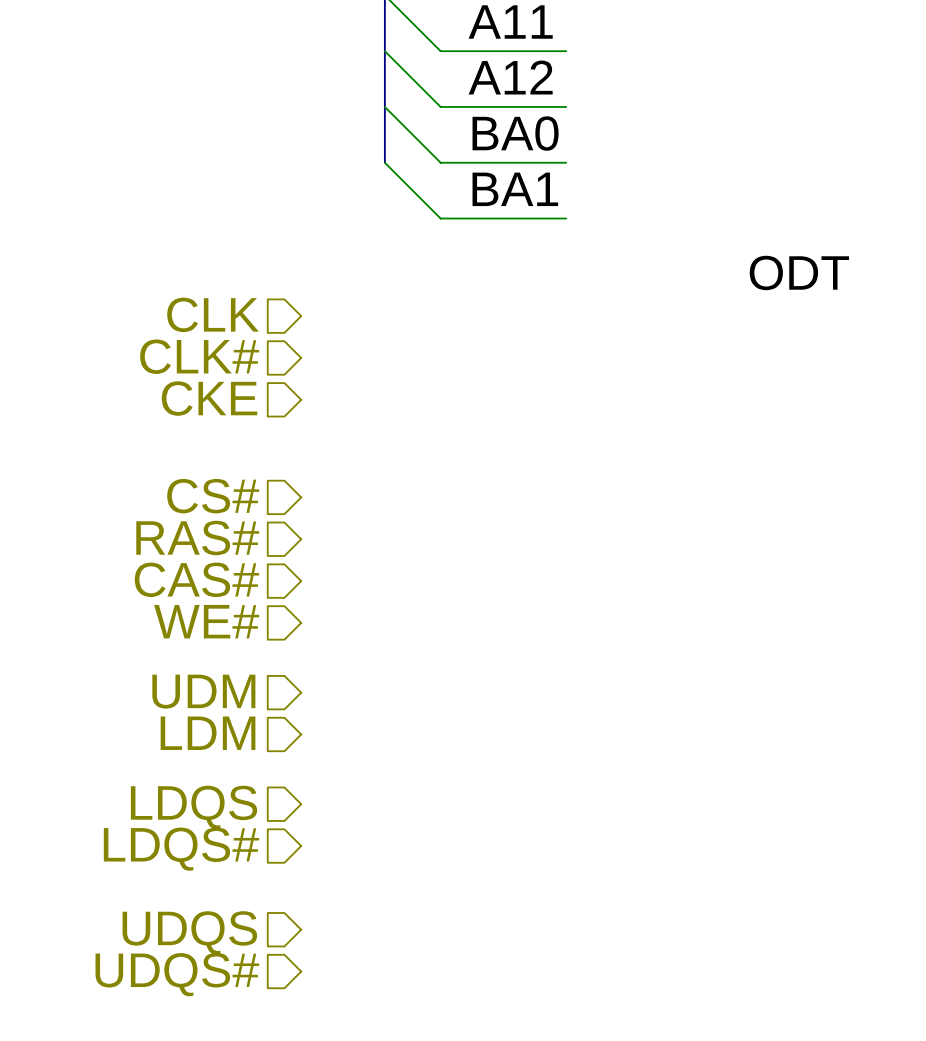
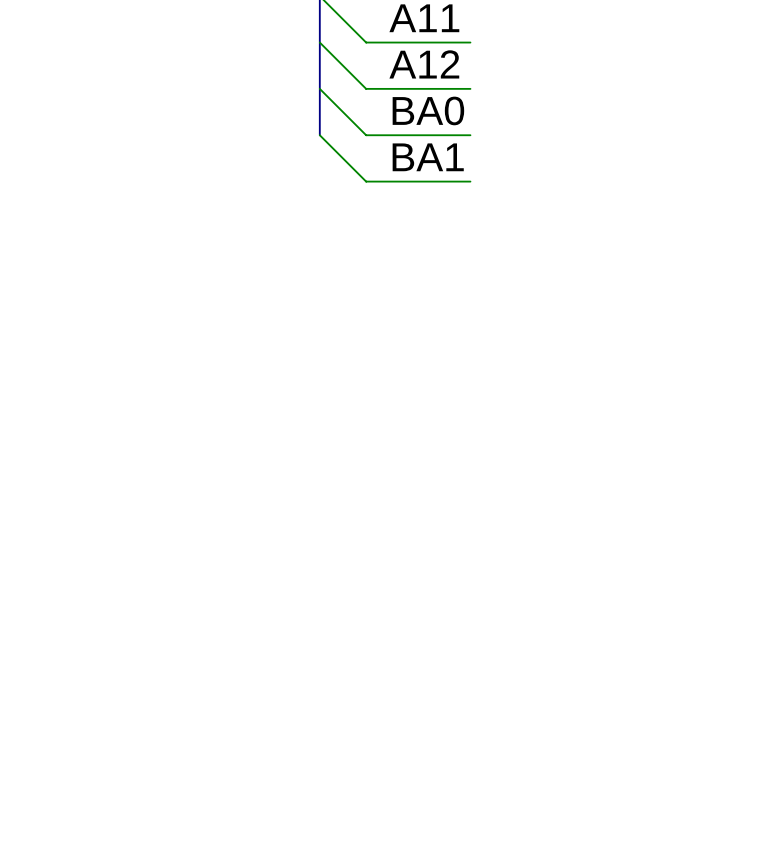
label: ODT (799, 272) -> none
hierarchical label: CLK (213, 314) -> none
hierarchical label: CLK# (199, 356) -> none
hierarchical label: CKE (209, 398) -> none
hierarchical label: CS# (213, 496) -> none
hierarchical label: RAS# (197, 537) -> none
hierarchical label: CAS# (196, 579) -> none
hierarchical label: WE# (206, 621) -> none
hierarchical label: UDM (203, 691) -> none
hierarchical label: LDM (208, 733) -> none
hierarchical label: LDQS (194, 807) -> none
hierarchical label: LDQS# (181, 849) -> none
hierarchical label: UDQS (189, 932) -> none
hierarchical label: UDQS# (177, 974) -> none

